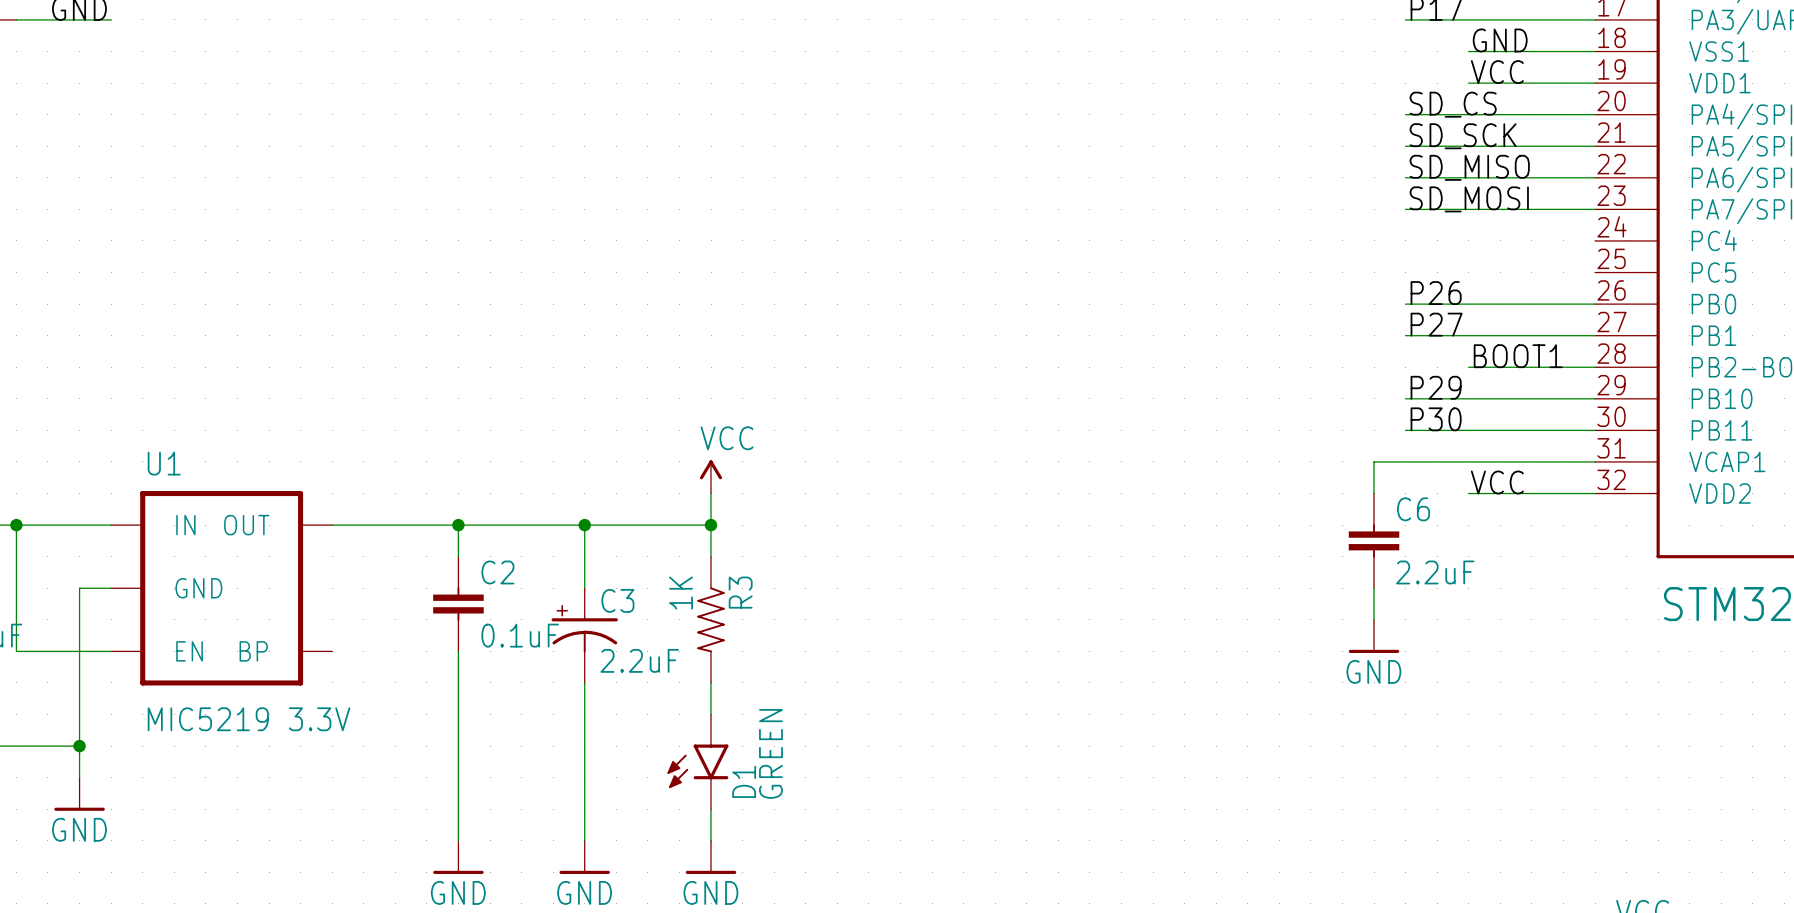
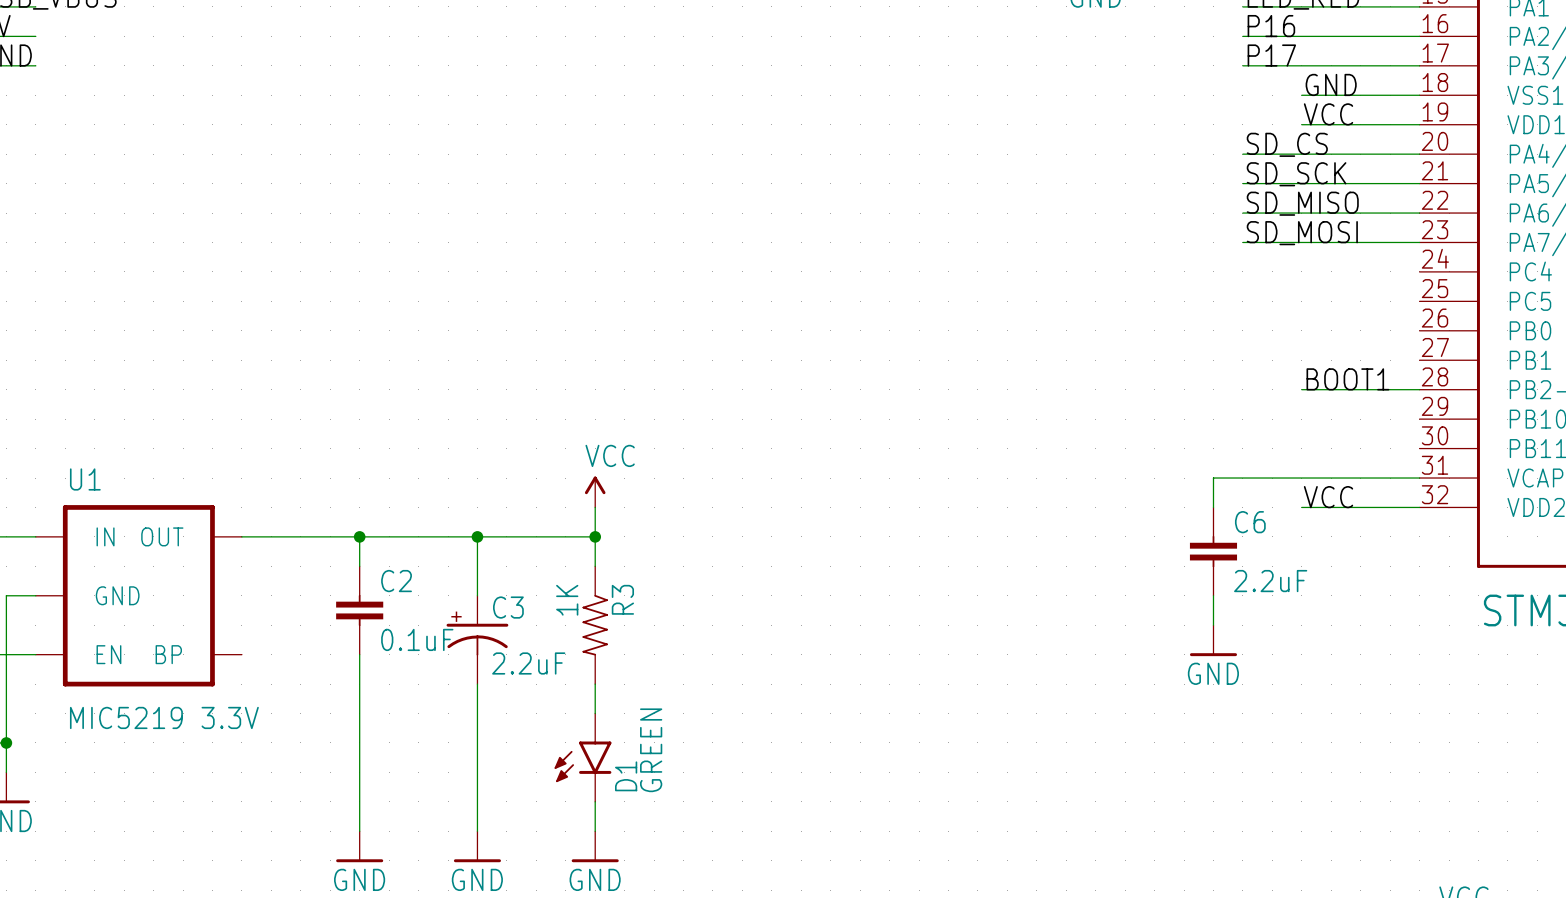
label: P26 (1436, 293) -> none
wire: (1405, 304) (1595, 304) -> none
label: P27 (1436, 324) -> none
wire: (1405, 335) (1595, 335) -> none
label: P29 (1436, 387) -> none
wire: (1405, 398) (1595, 398) -> none
label: P30 (1436, 419) -> none
wire: (1405, 430) (1595, 430) -> none

